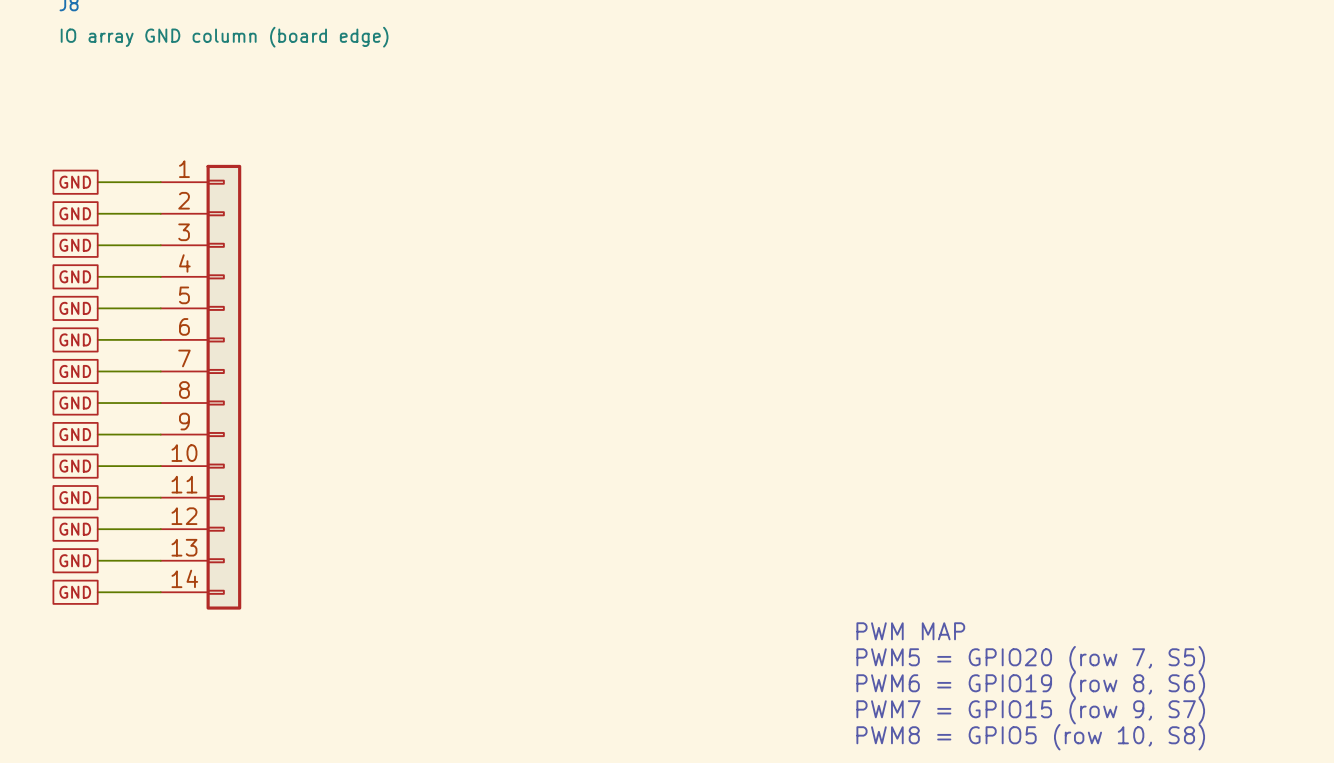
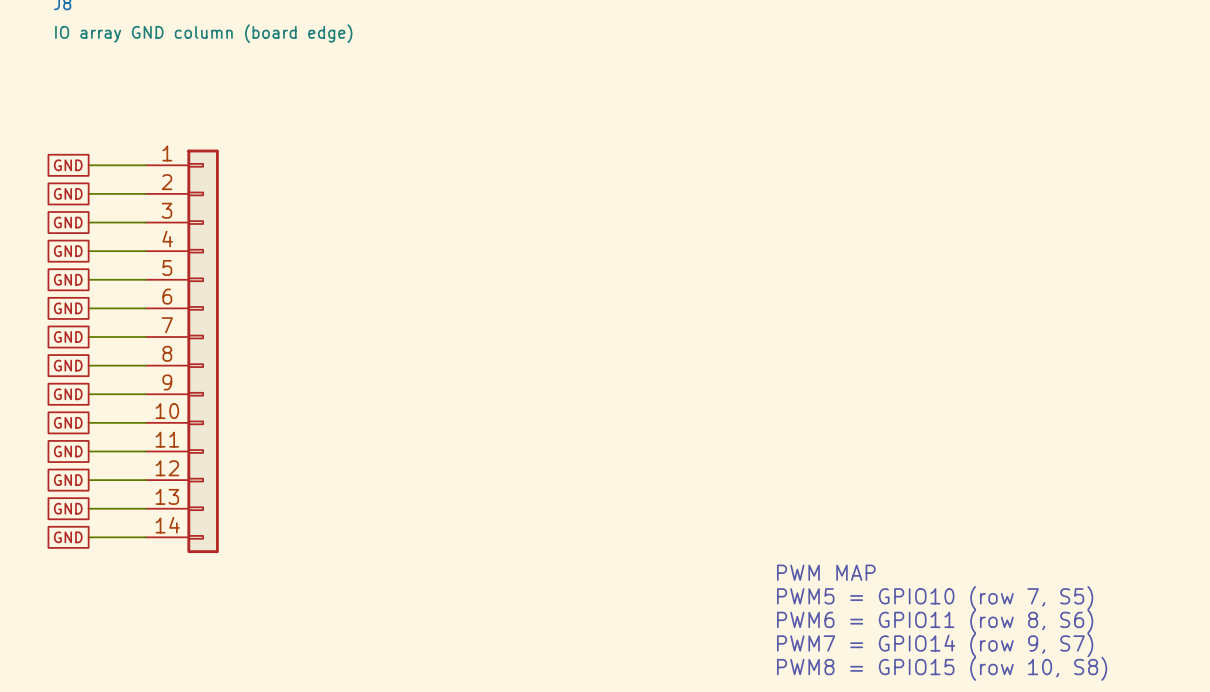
text: PWM5 = GPIO20 (row 7, S5) (1030, 659) -> PWM5 = GPIO10 (row 7, S5) (935, 598)
text: PWM6 = GPIO19 (row 8, S6) (1030, 685) -> PWM6 = GPIO11 (row 8, S6) (935, 621)
text: PWM7 = GPIO15 (row 9, S7) (1030, 711) -> PWM7 = GPIO14 (row 9, S7) (935, 645)
text: PWM8 = GPIO5 (row 10, S8) (1030, 737) -> PWM8 = GPIO15 (row 10, S8) (942, 668)

